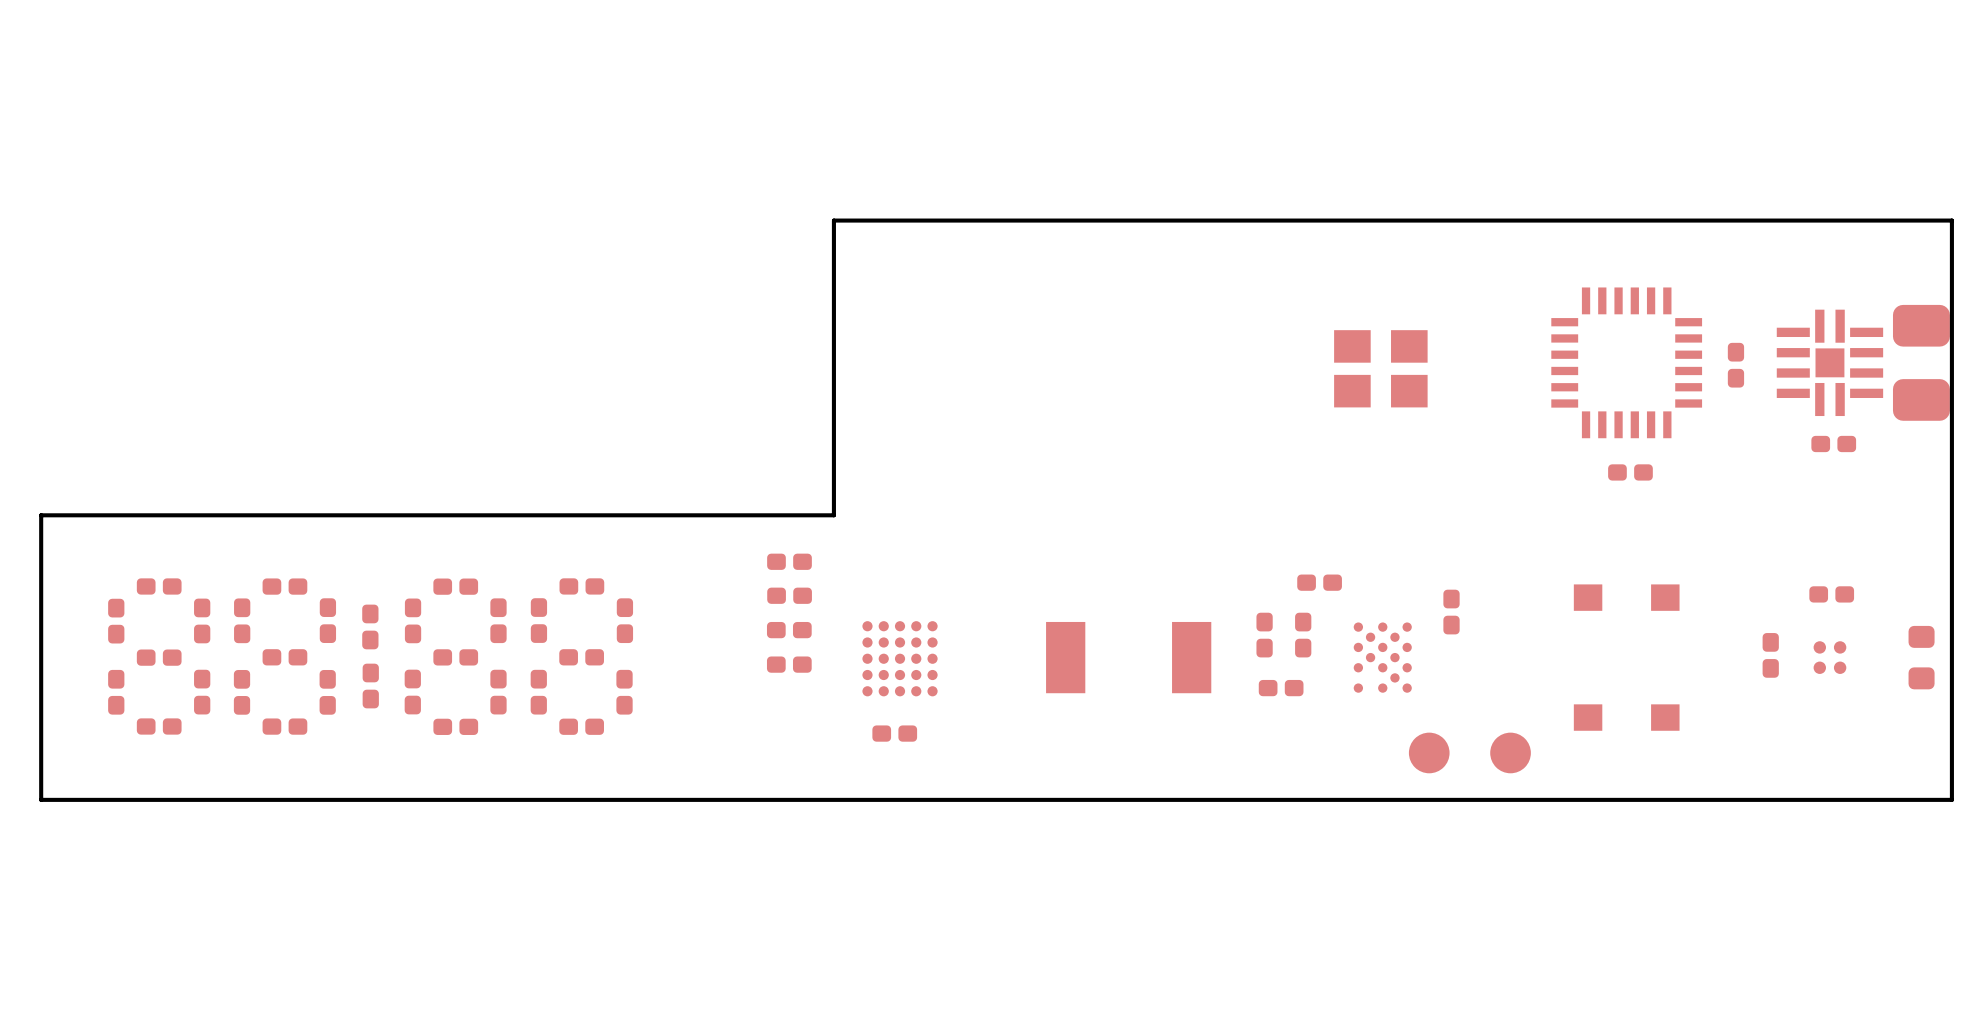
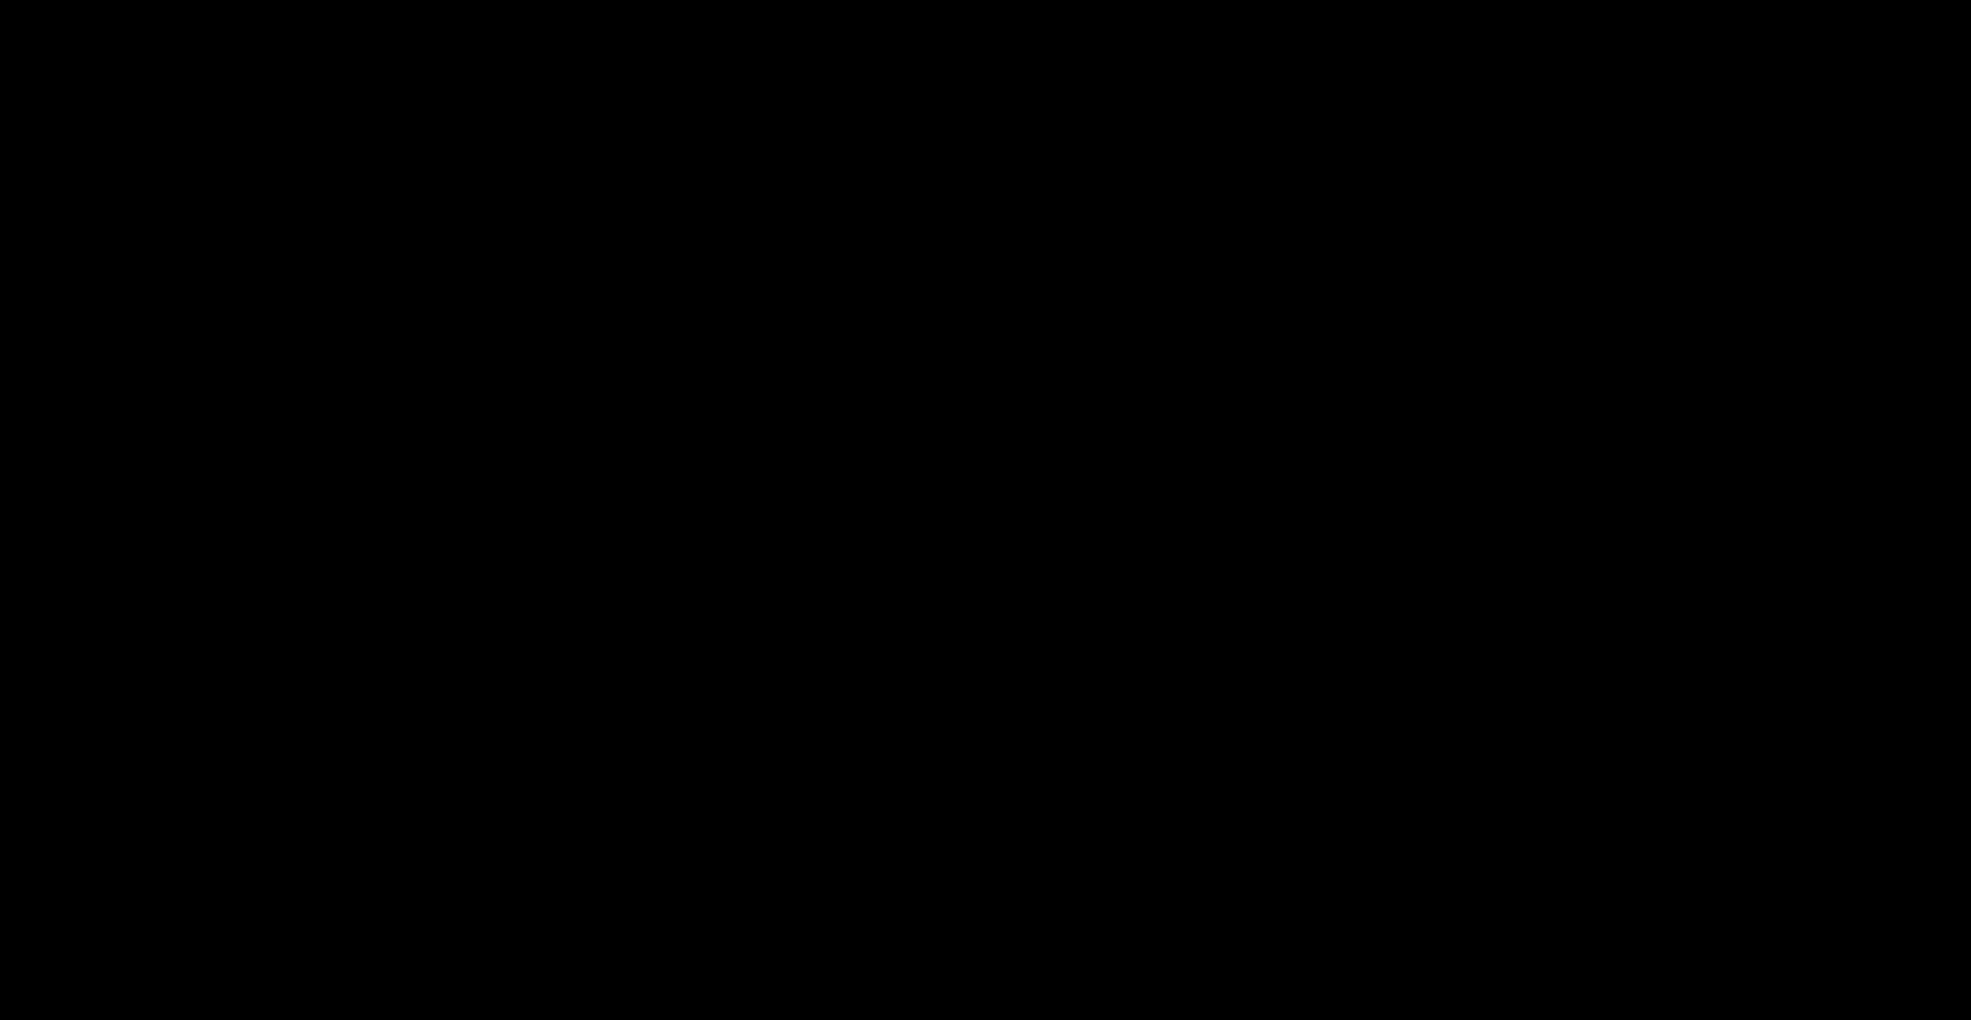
board edge: (1951, 220) (1951, 799) (41, 799) (41, 515) (833, 515) (833, 220) (1951, 220) -> none
part: (1626, 362) -> none
part: (1829, 362) -> none
part: (1921, 362) -> none
part: (1735, 365) -> none
part: (1380, 368) -> none
part: (1833, 443) -> none
part: (1630, 472) -> none
part: (789, 561) -> none
part: (1319, 582) -> none
part: (159, 586) -> none
part: (284, 586) -> none
part: (455, 586) -> none
part: (581, 586) -> none
part: (1831, 594) -> none
part: (789, 595) -> none
part: (1451, 612) -> none
part: (202, 620) -> none
part: (242, 620) -> none
part: (327, 620) -> none
part: (413, 620) -> none
part: (498, 620) -> none
part: (538, 620) -> none
part: (624, 620) -> none
part: (116, 621) -> none
part: (370, 626) -> none
part: (789, 630) -> none
part: (1264, 635) -> none
part: (1303, 635) -> none
part: (1770, 655) -> none
part: (159, 657) -> none
part: (284, 657) -> none
part: (455, 657) -> none
part: (581, 657) -> none
part: (1128, 657) -> none
part: (1382, 657) -> none
part: (1626, 657) -> none
part: (1829, 657) -> none
part: (1921, 657) -> none
part: (900, 658) -> none
part: (789, 664) -> none
part: (370, 686) -> none
part: (1281, 688) -> none
part: (116, 692) -> none
part: (202, 692) -> none
part: (242, 692) -> none
part: (327, 692) -> none
part: (412, 692) -> none
part: (498, 692) -> none
part: (538, 692) -> none
part: (624, 692) -> none
part: (159, 726) -> none
part: (284, 726) -> none
part: (455, 726) -> none
part: (581, 726) -> none
part: (894, 733) -> none
part: (1429, 752) -> none
part: (1510, 752) -> none

